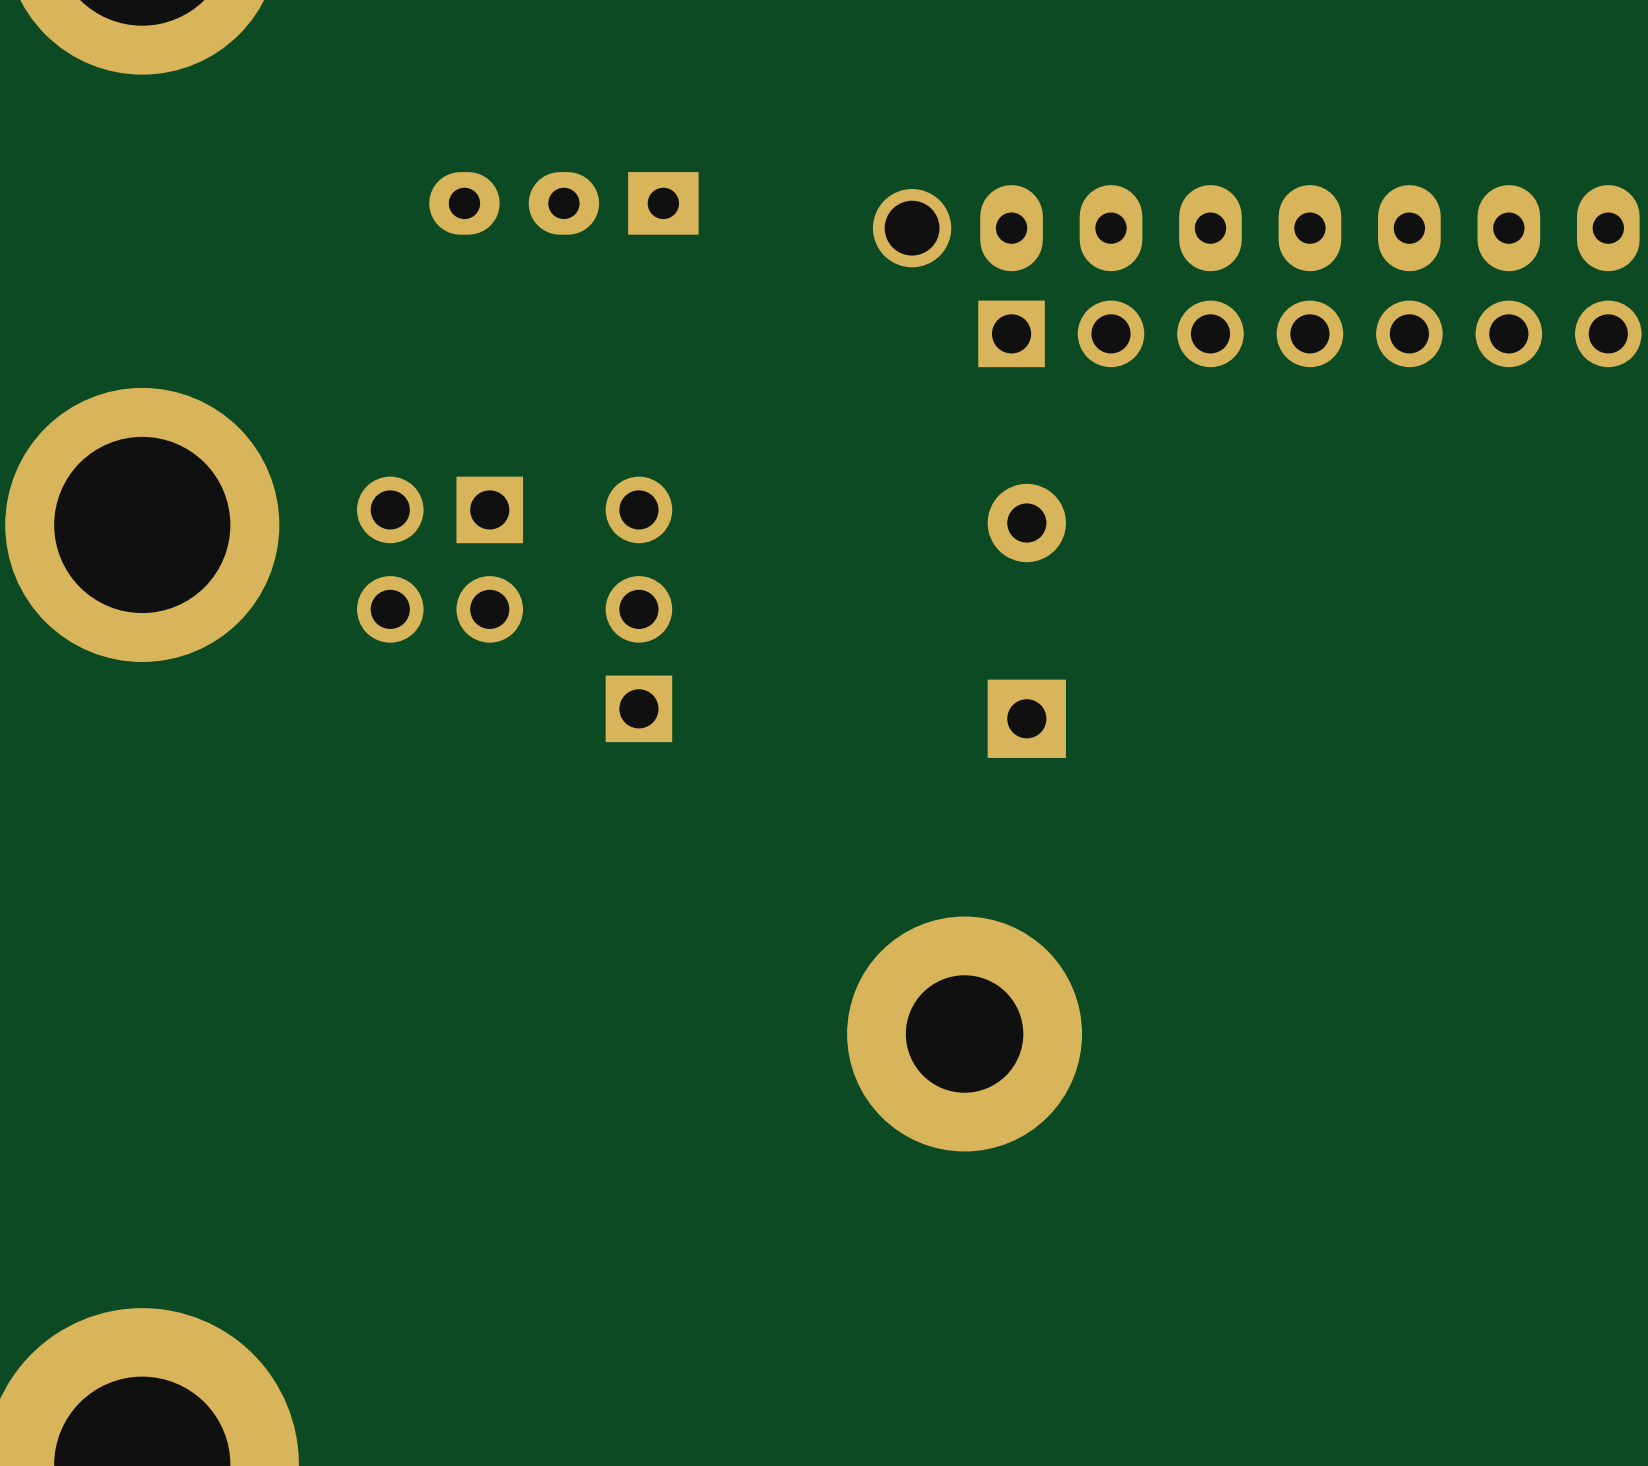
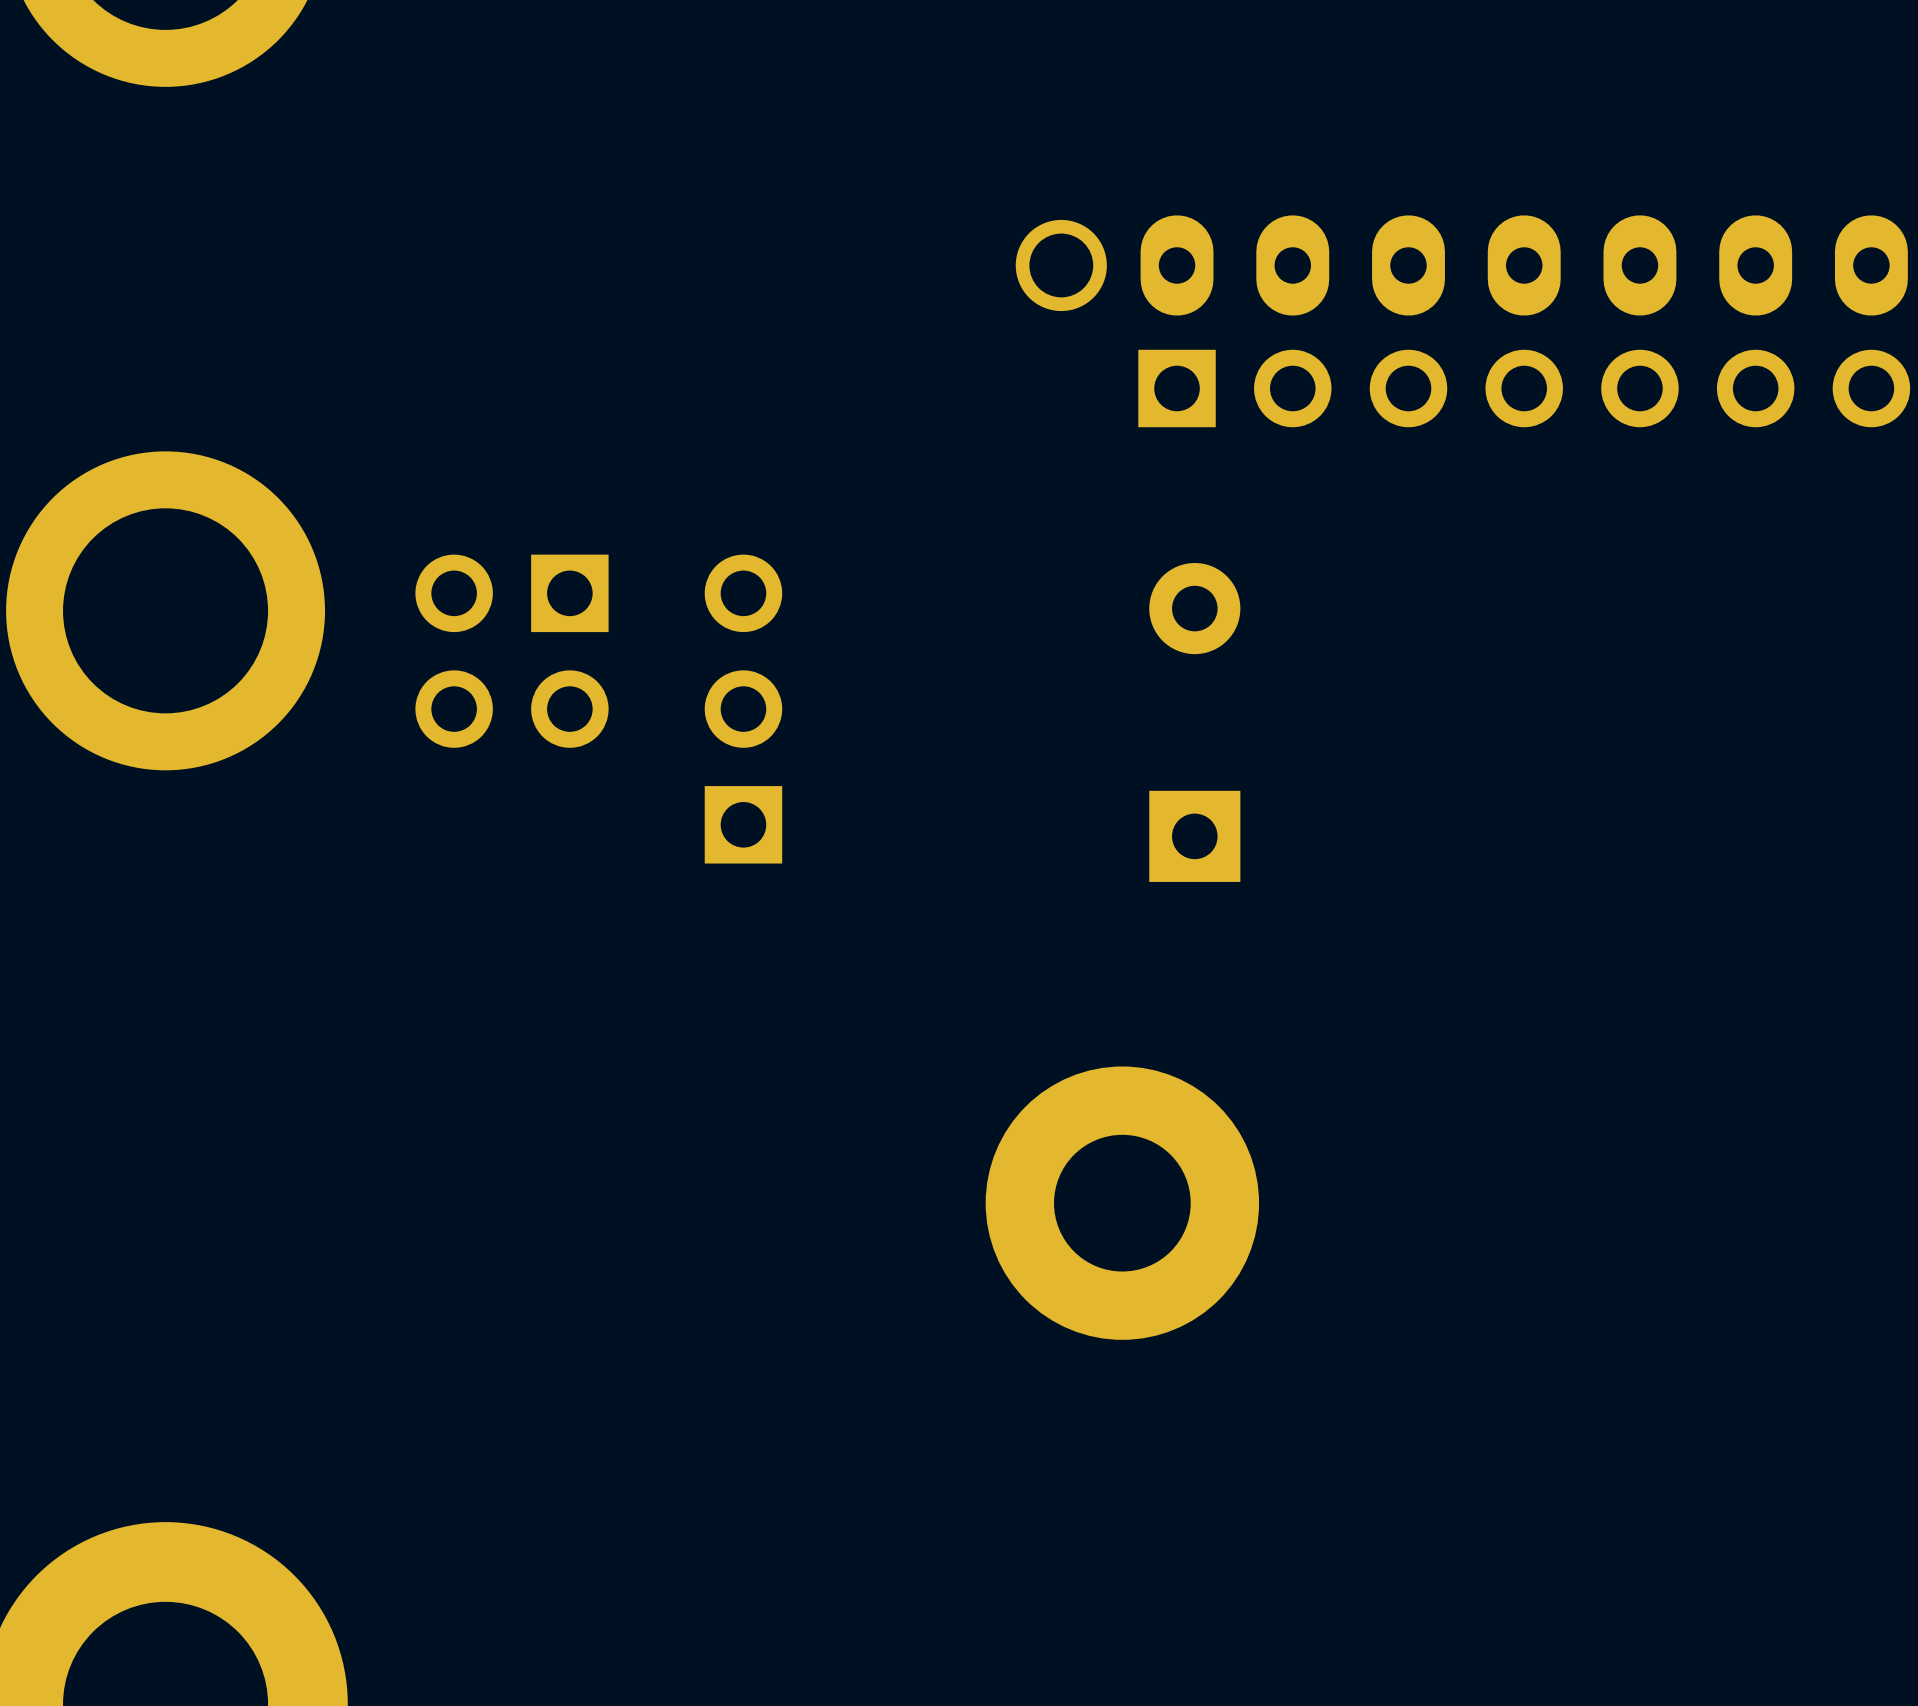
part: (563, 203) -> none

